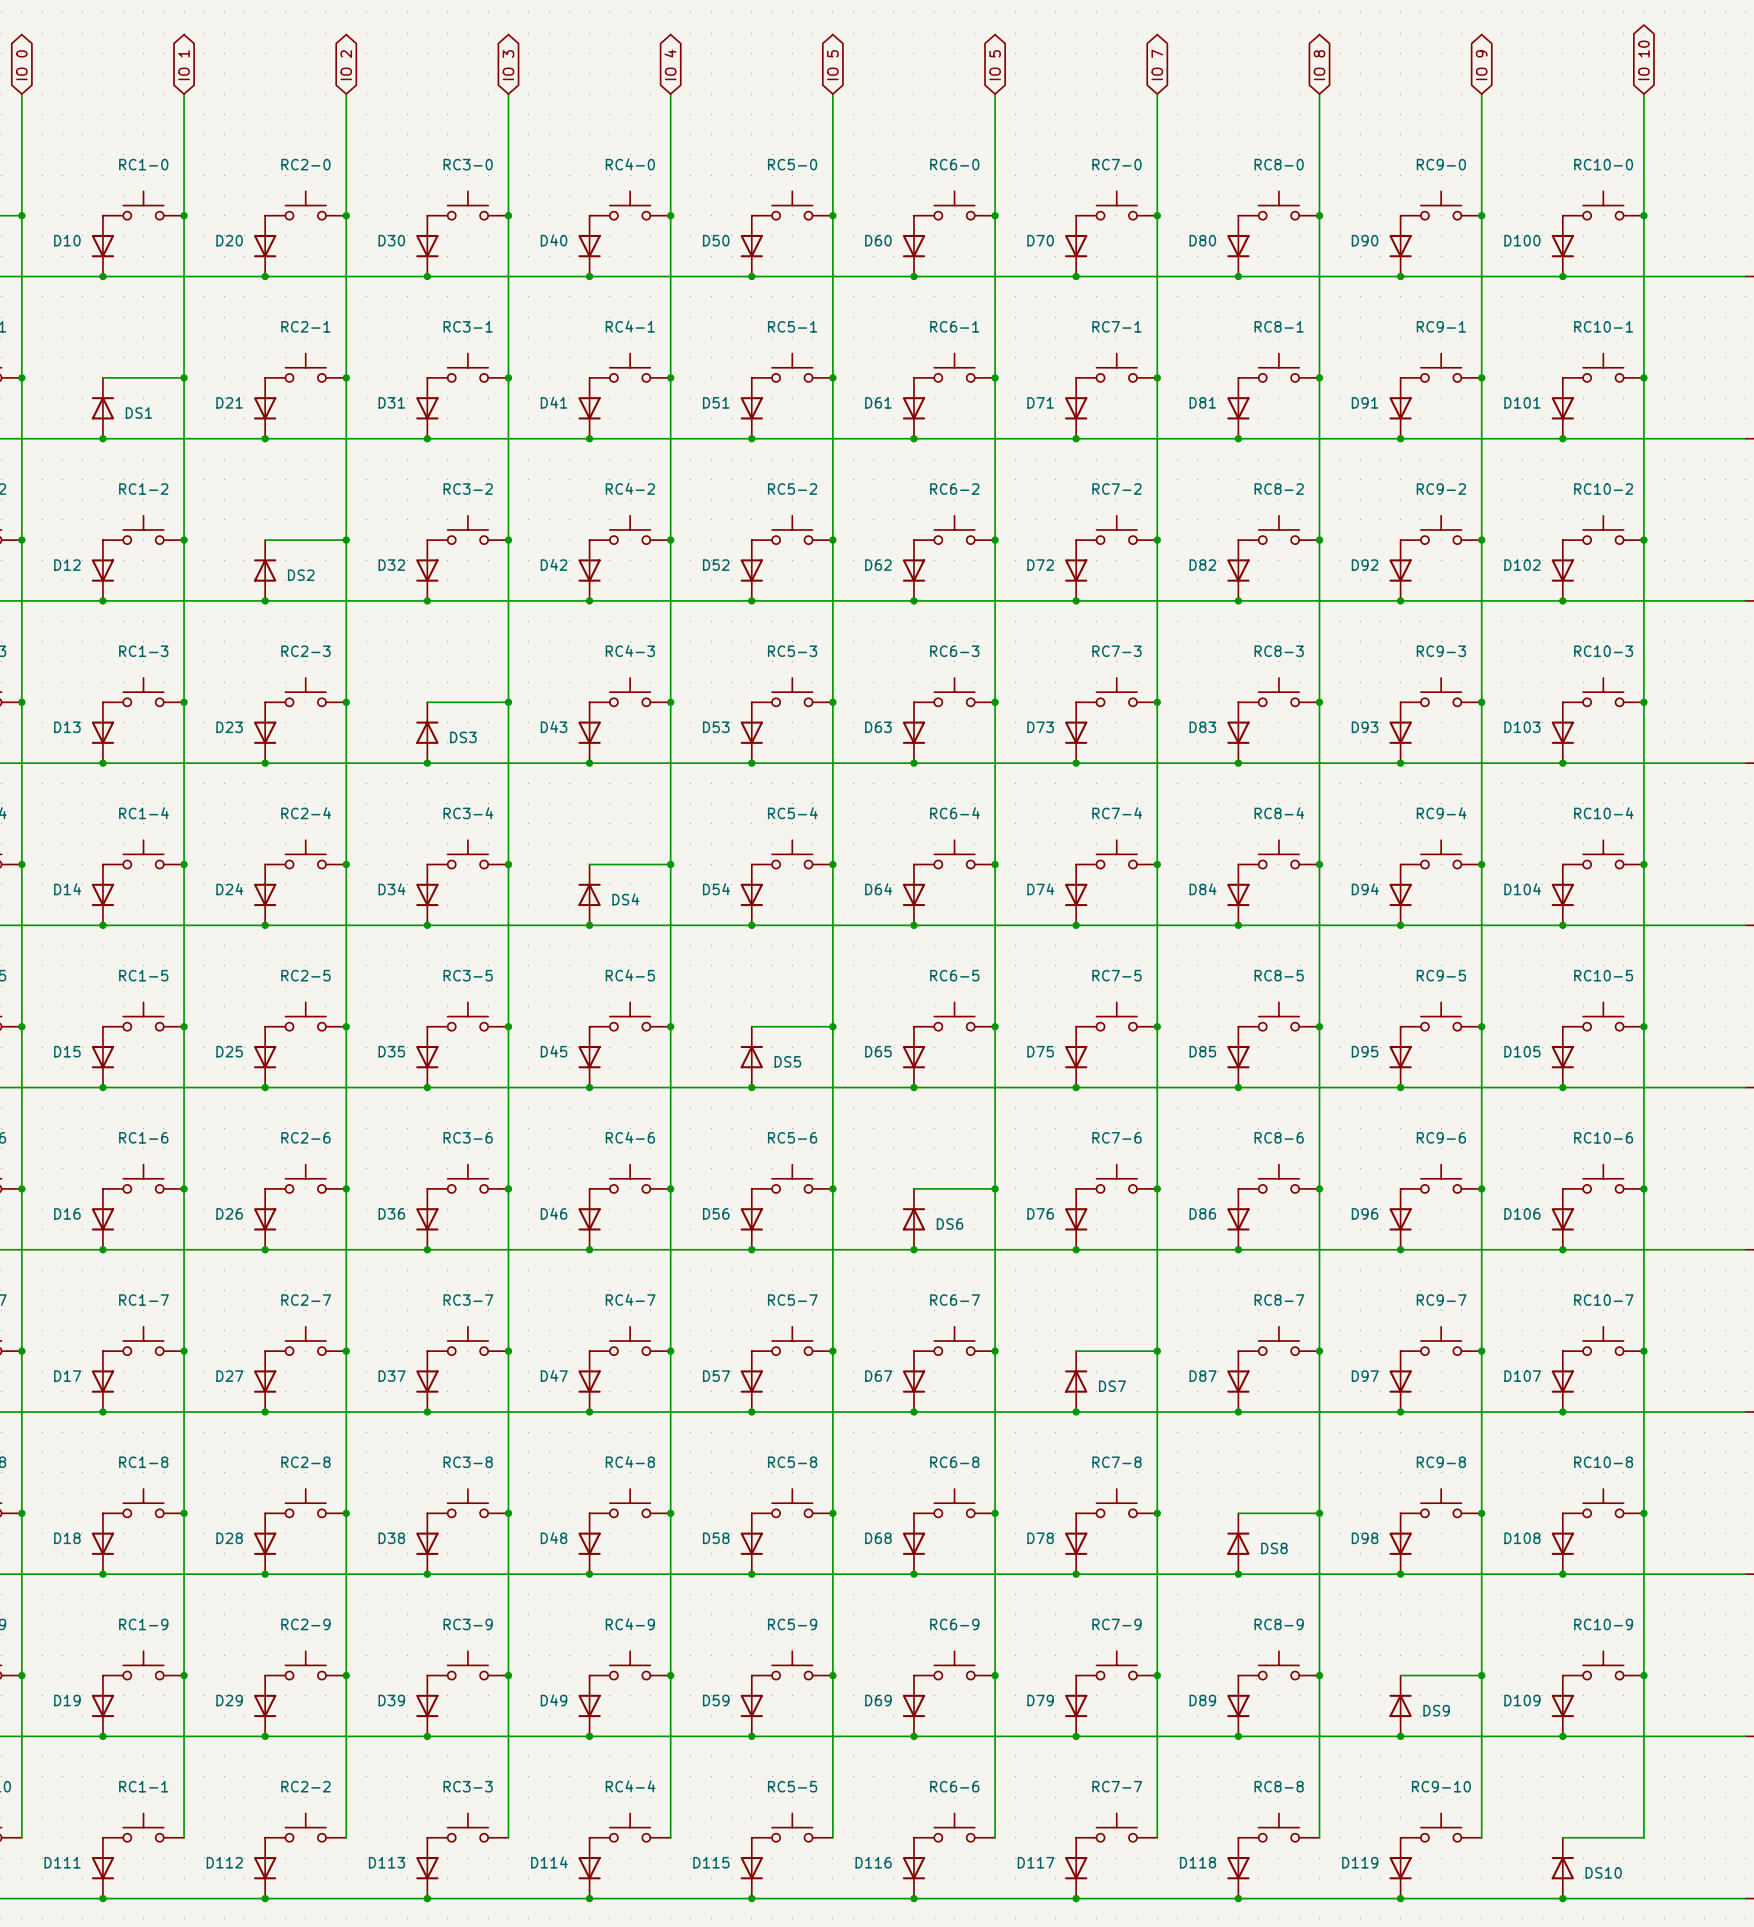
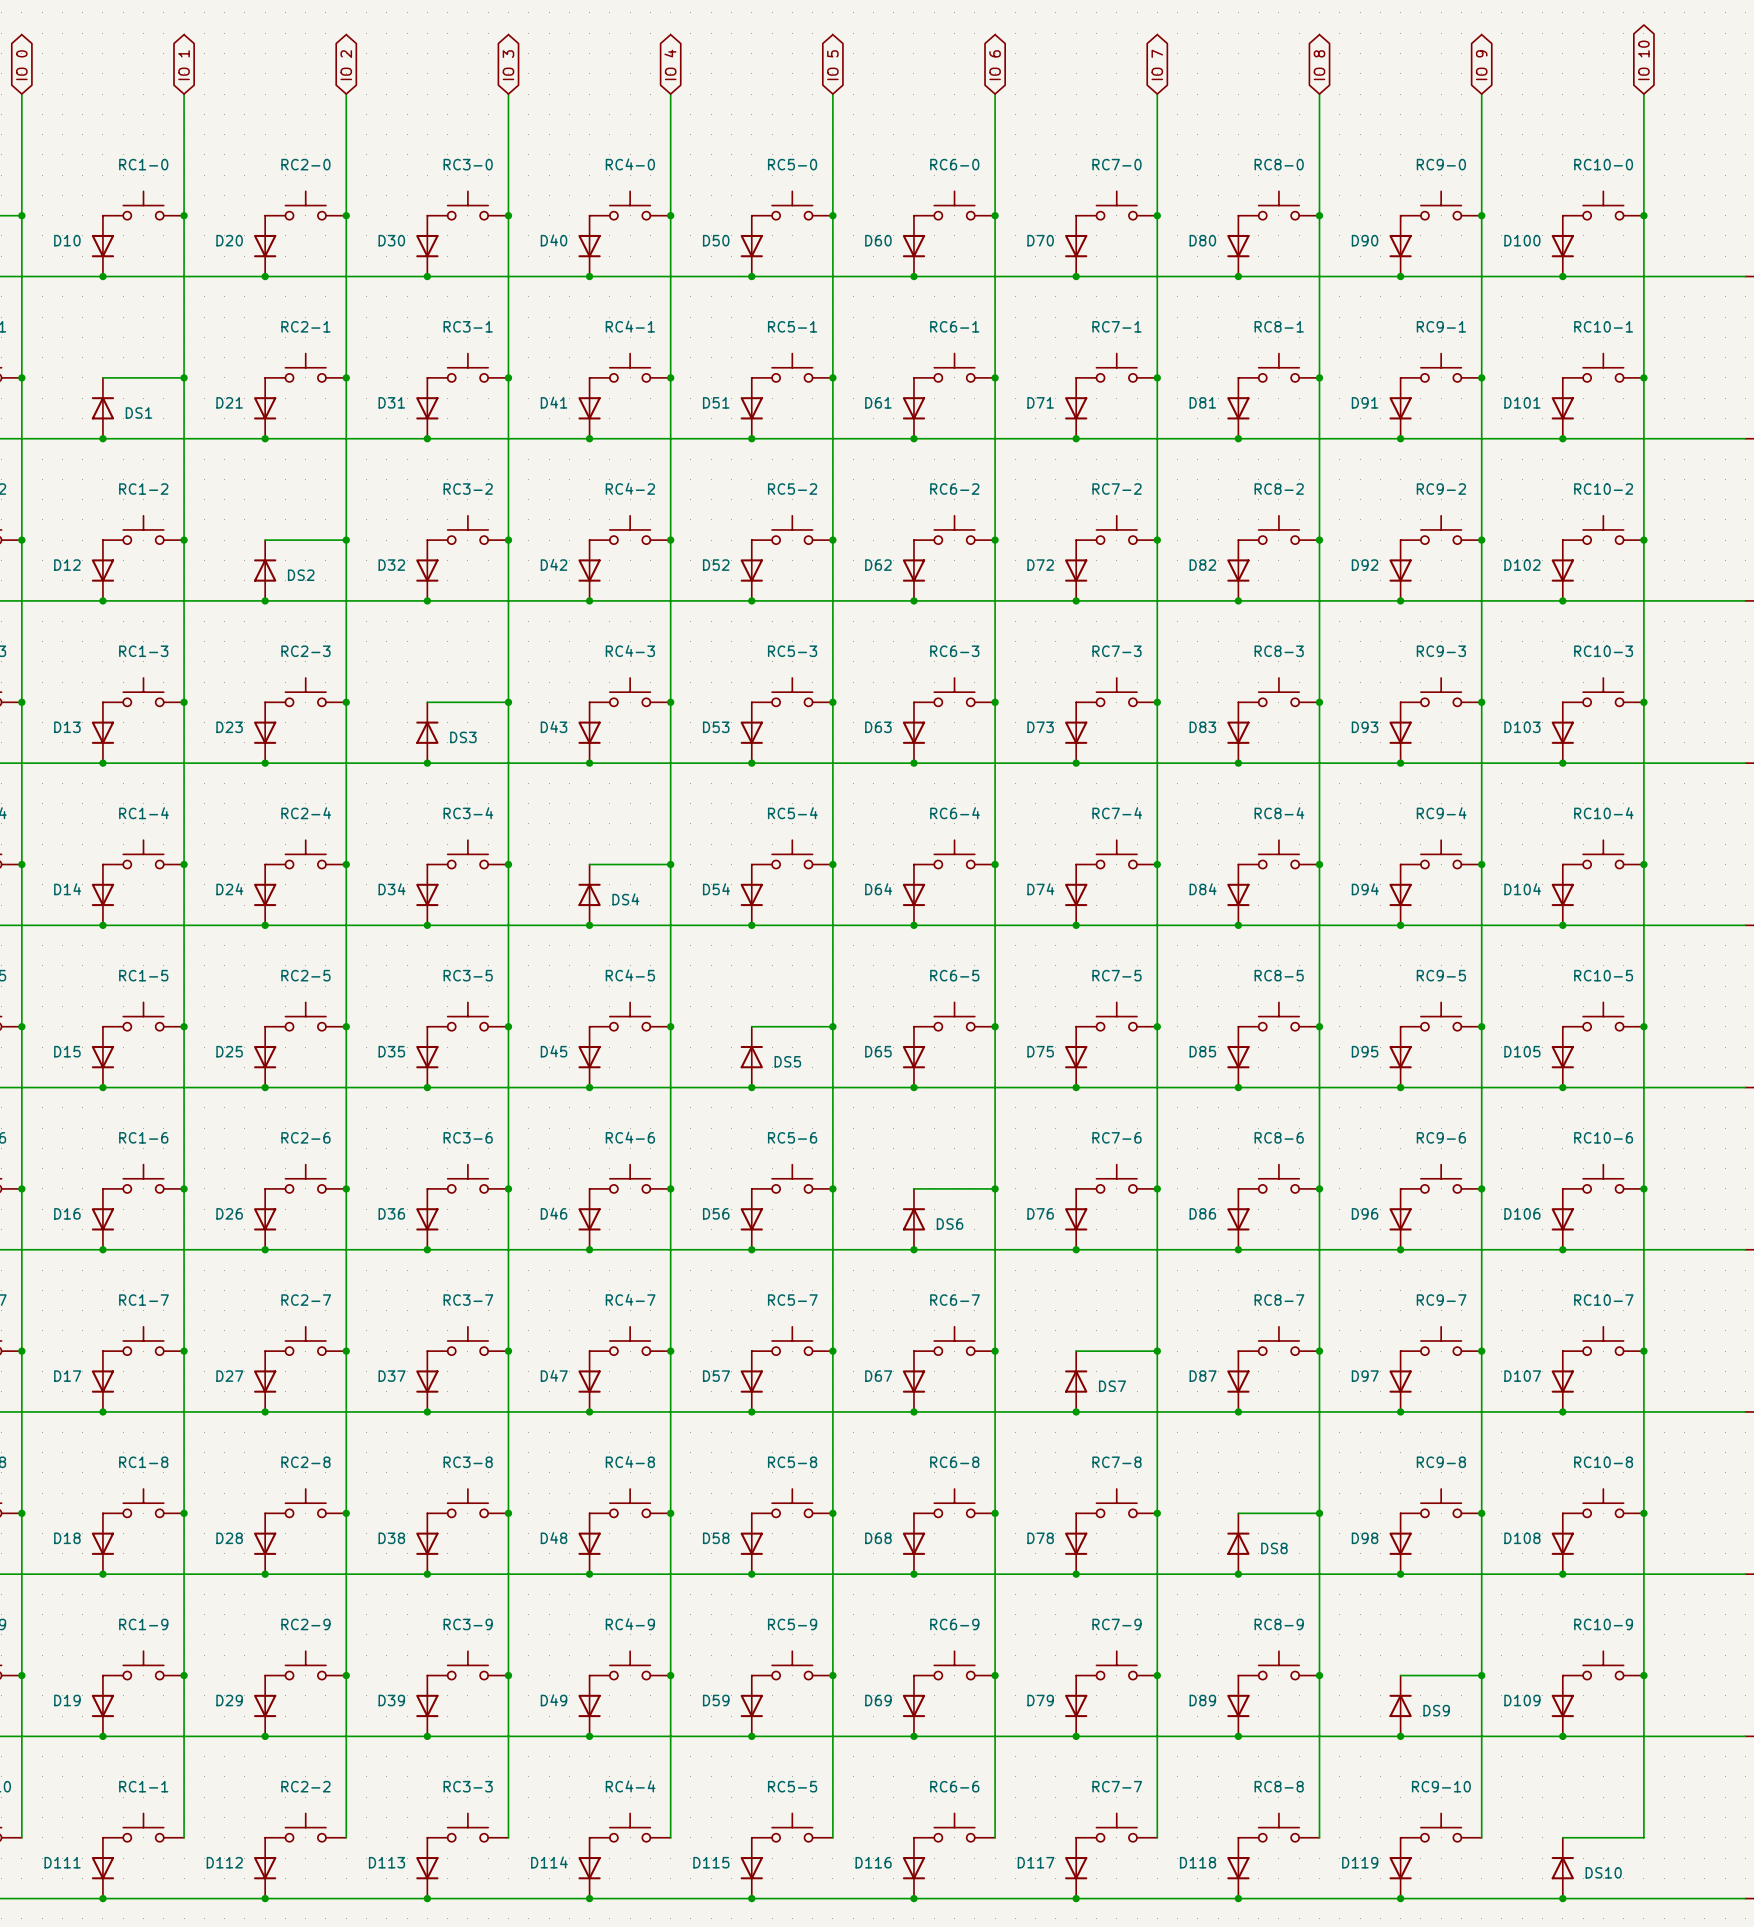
global label: IO 5 (995, 65) -> IO 6 (995, 65)

